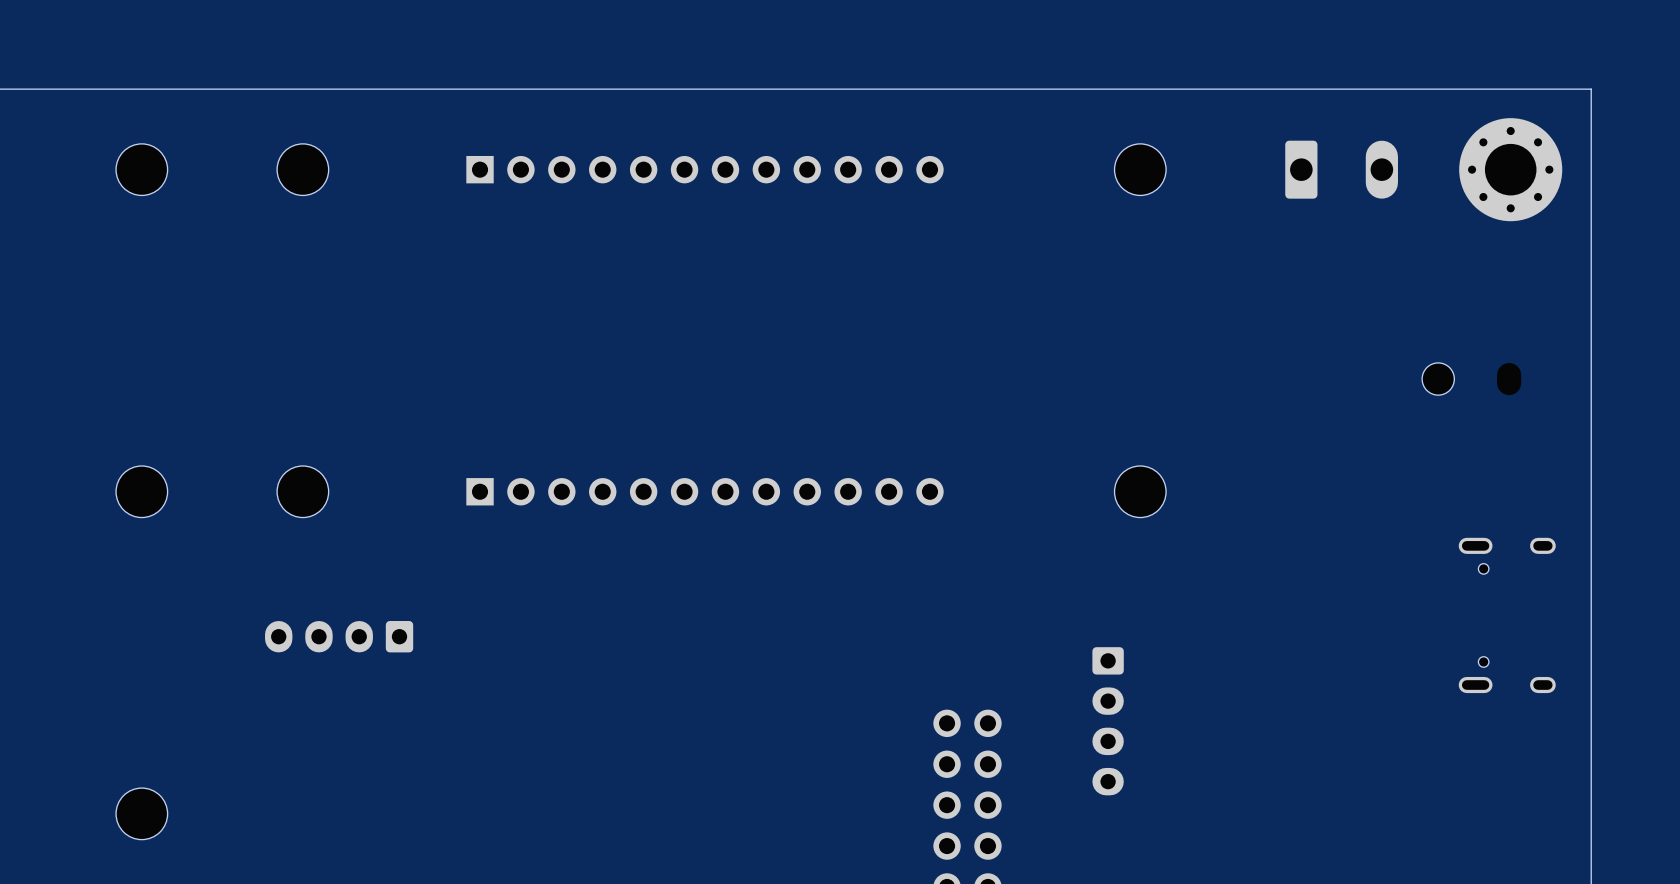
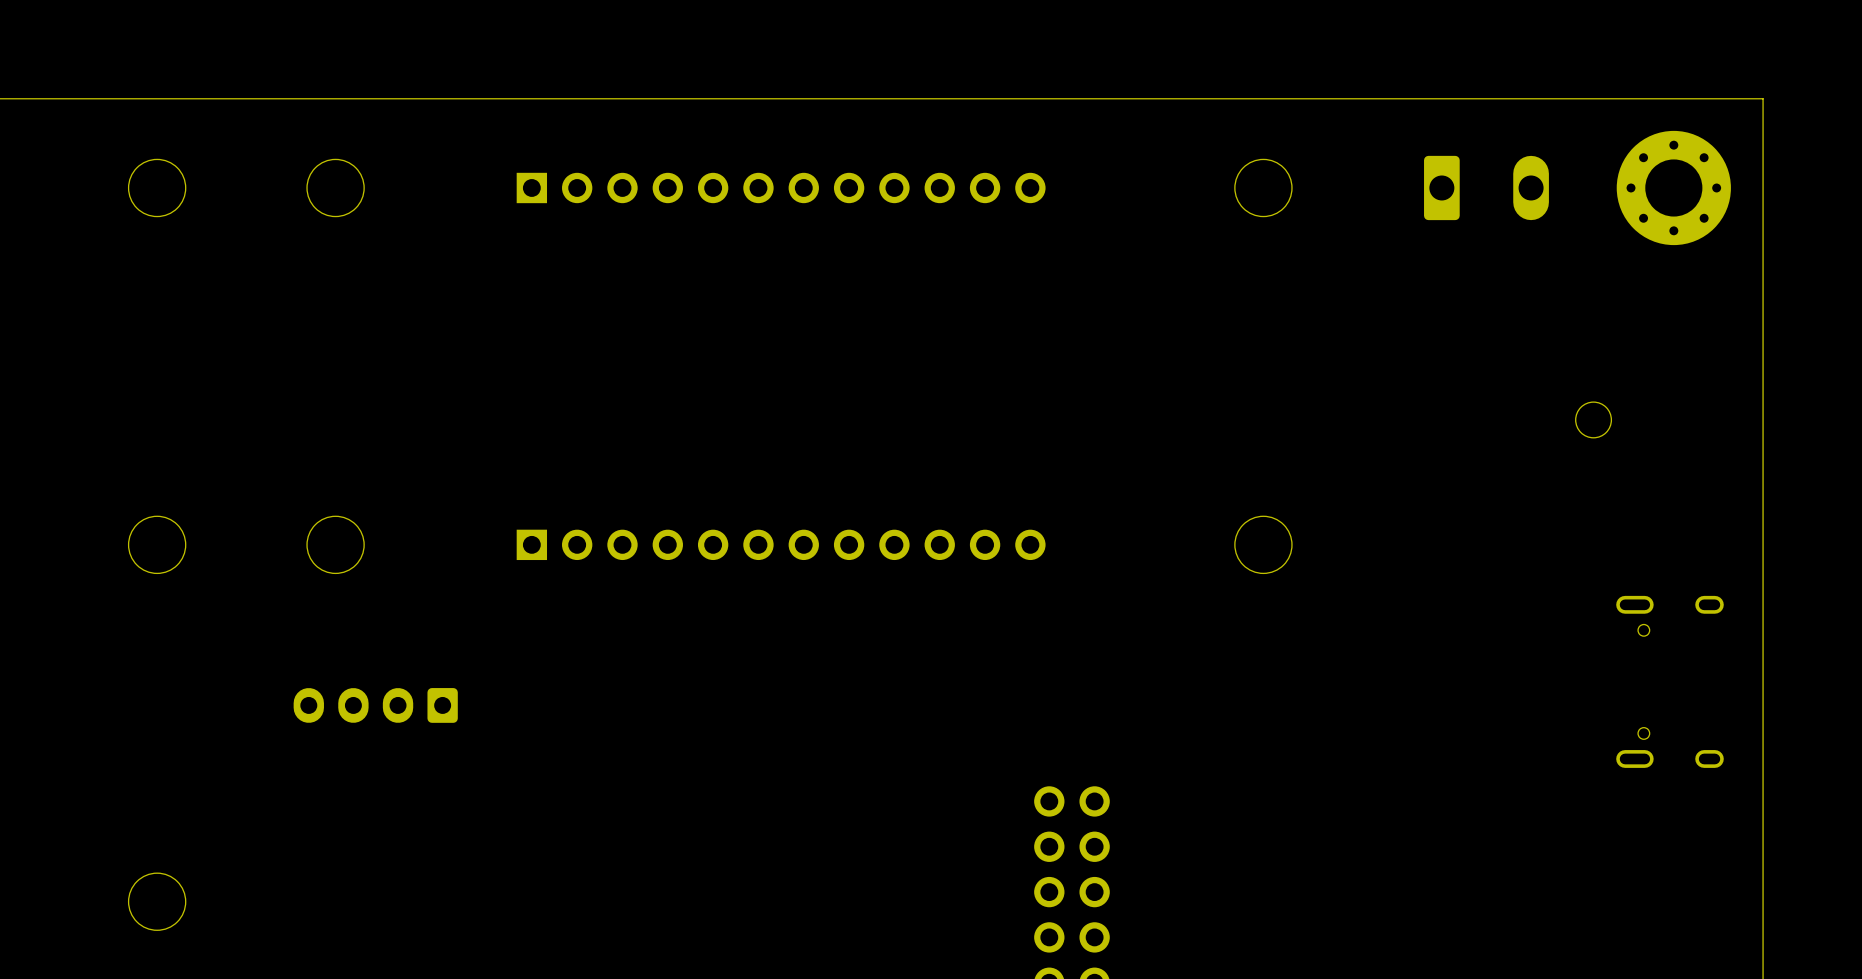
part: (1108, 721) -> none

